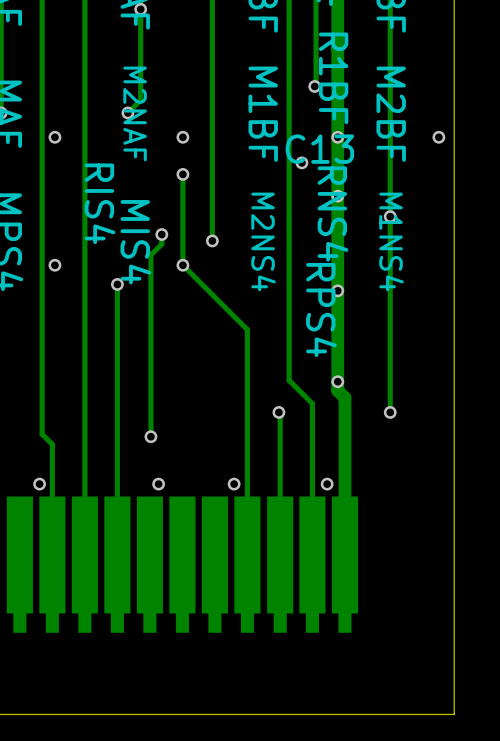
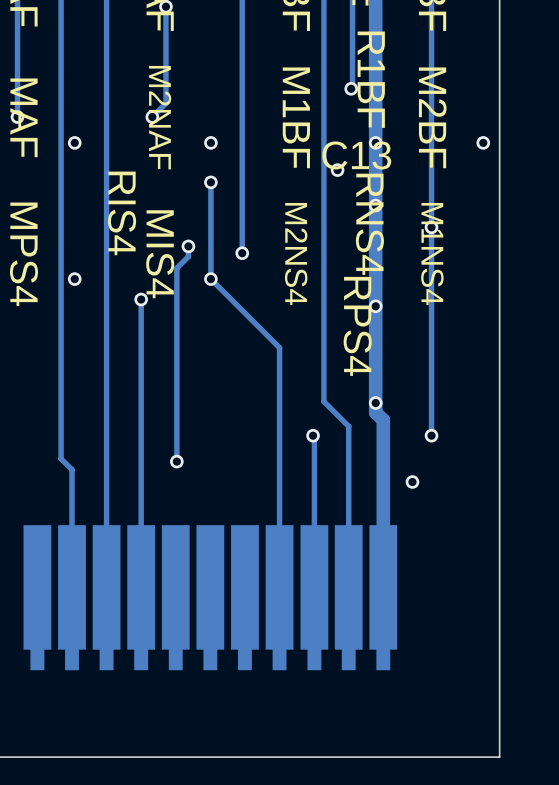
via: (39, 484) -> none
via: (158, 484) -> none
via: (234, 484) -> none
via position: (327, 484) -> (412, 482)

